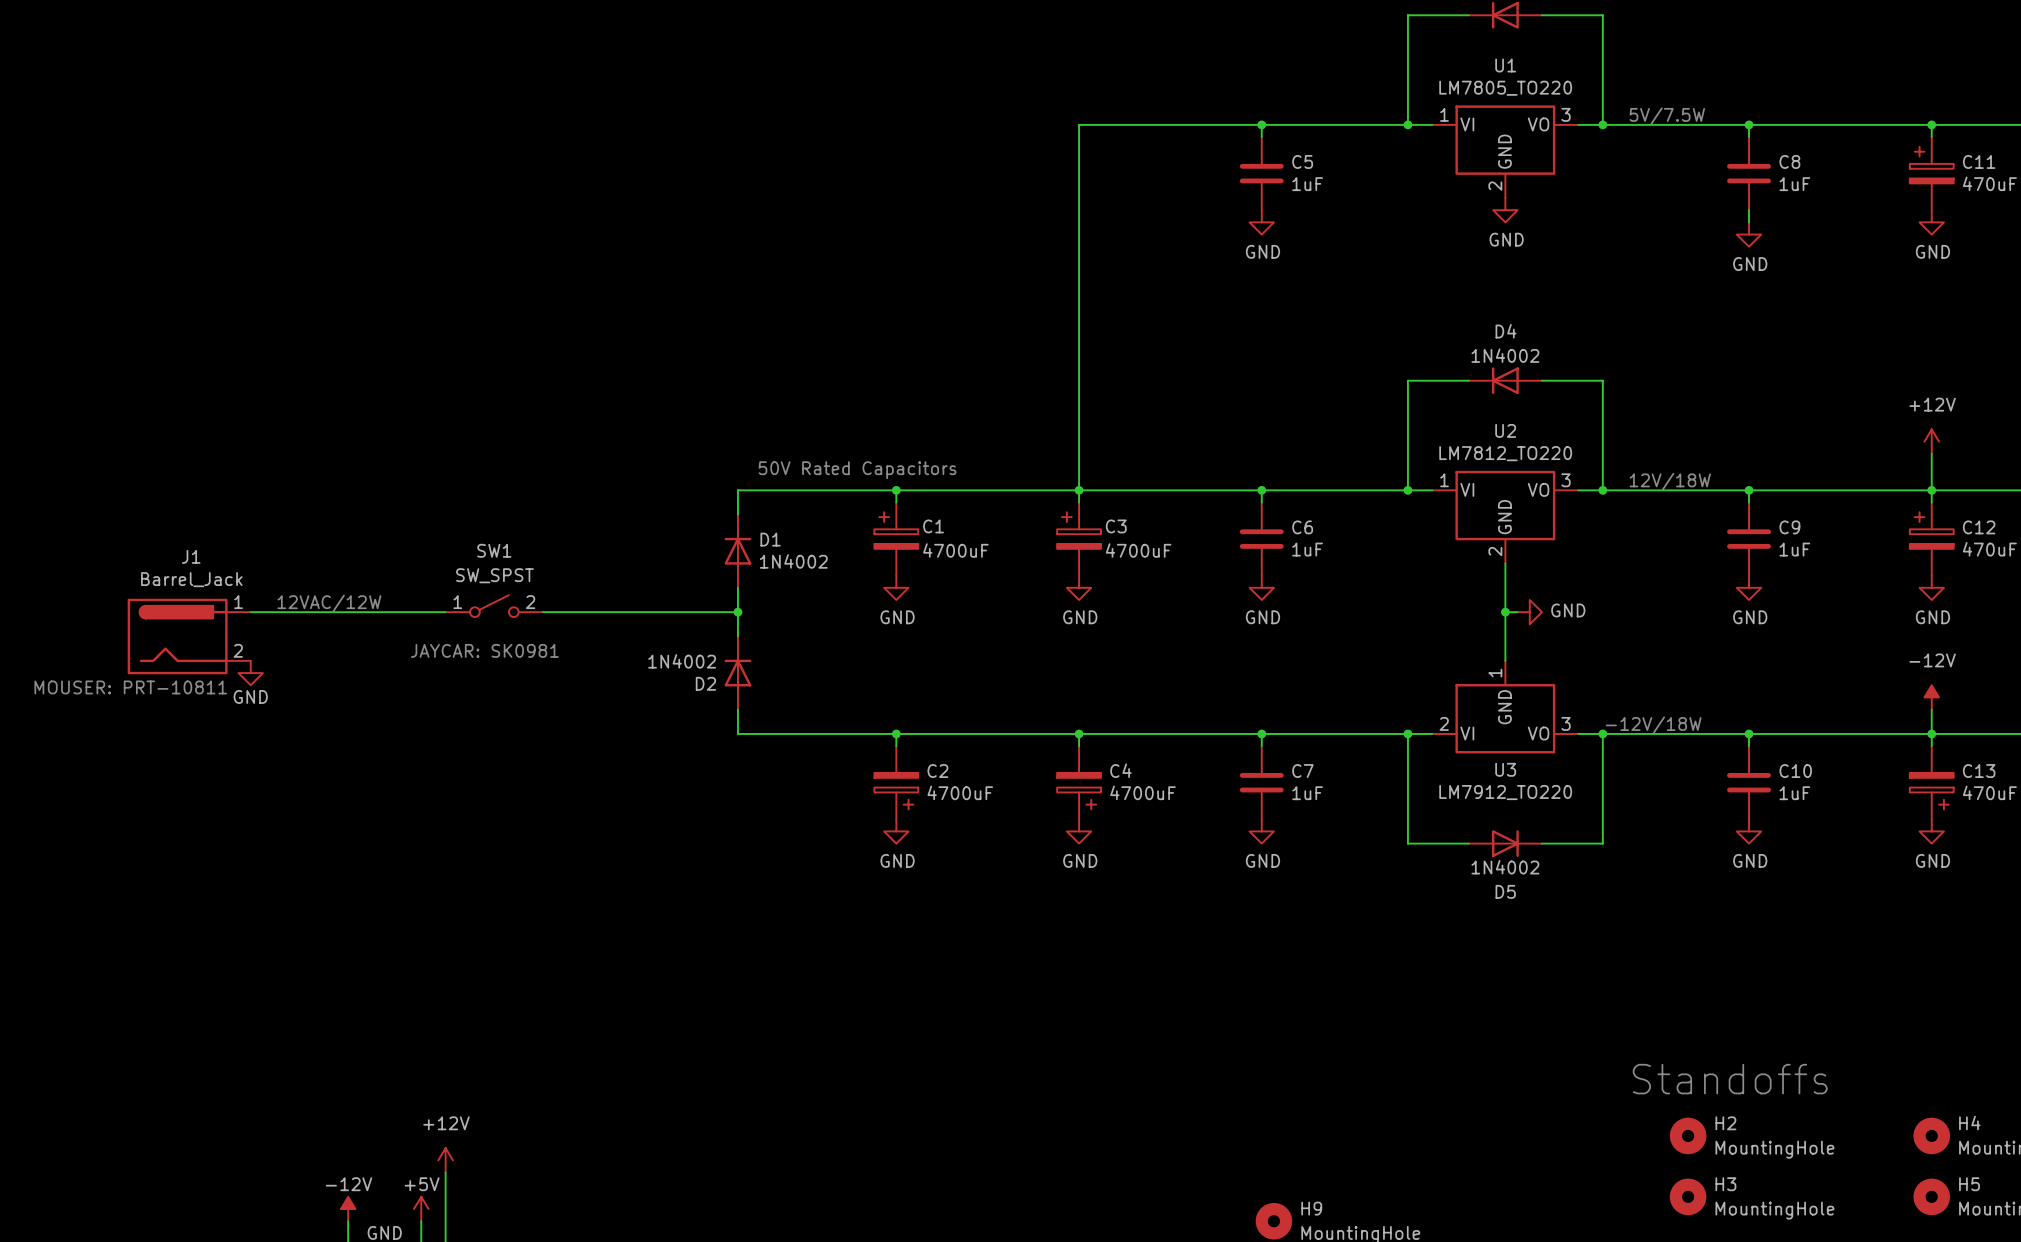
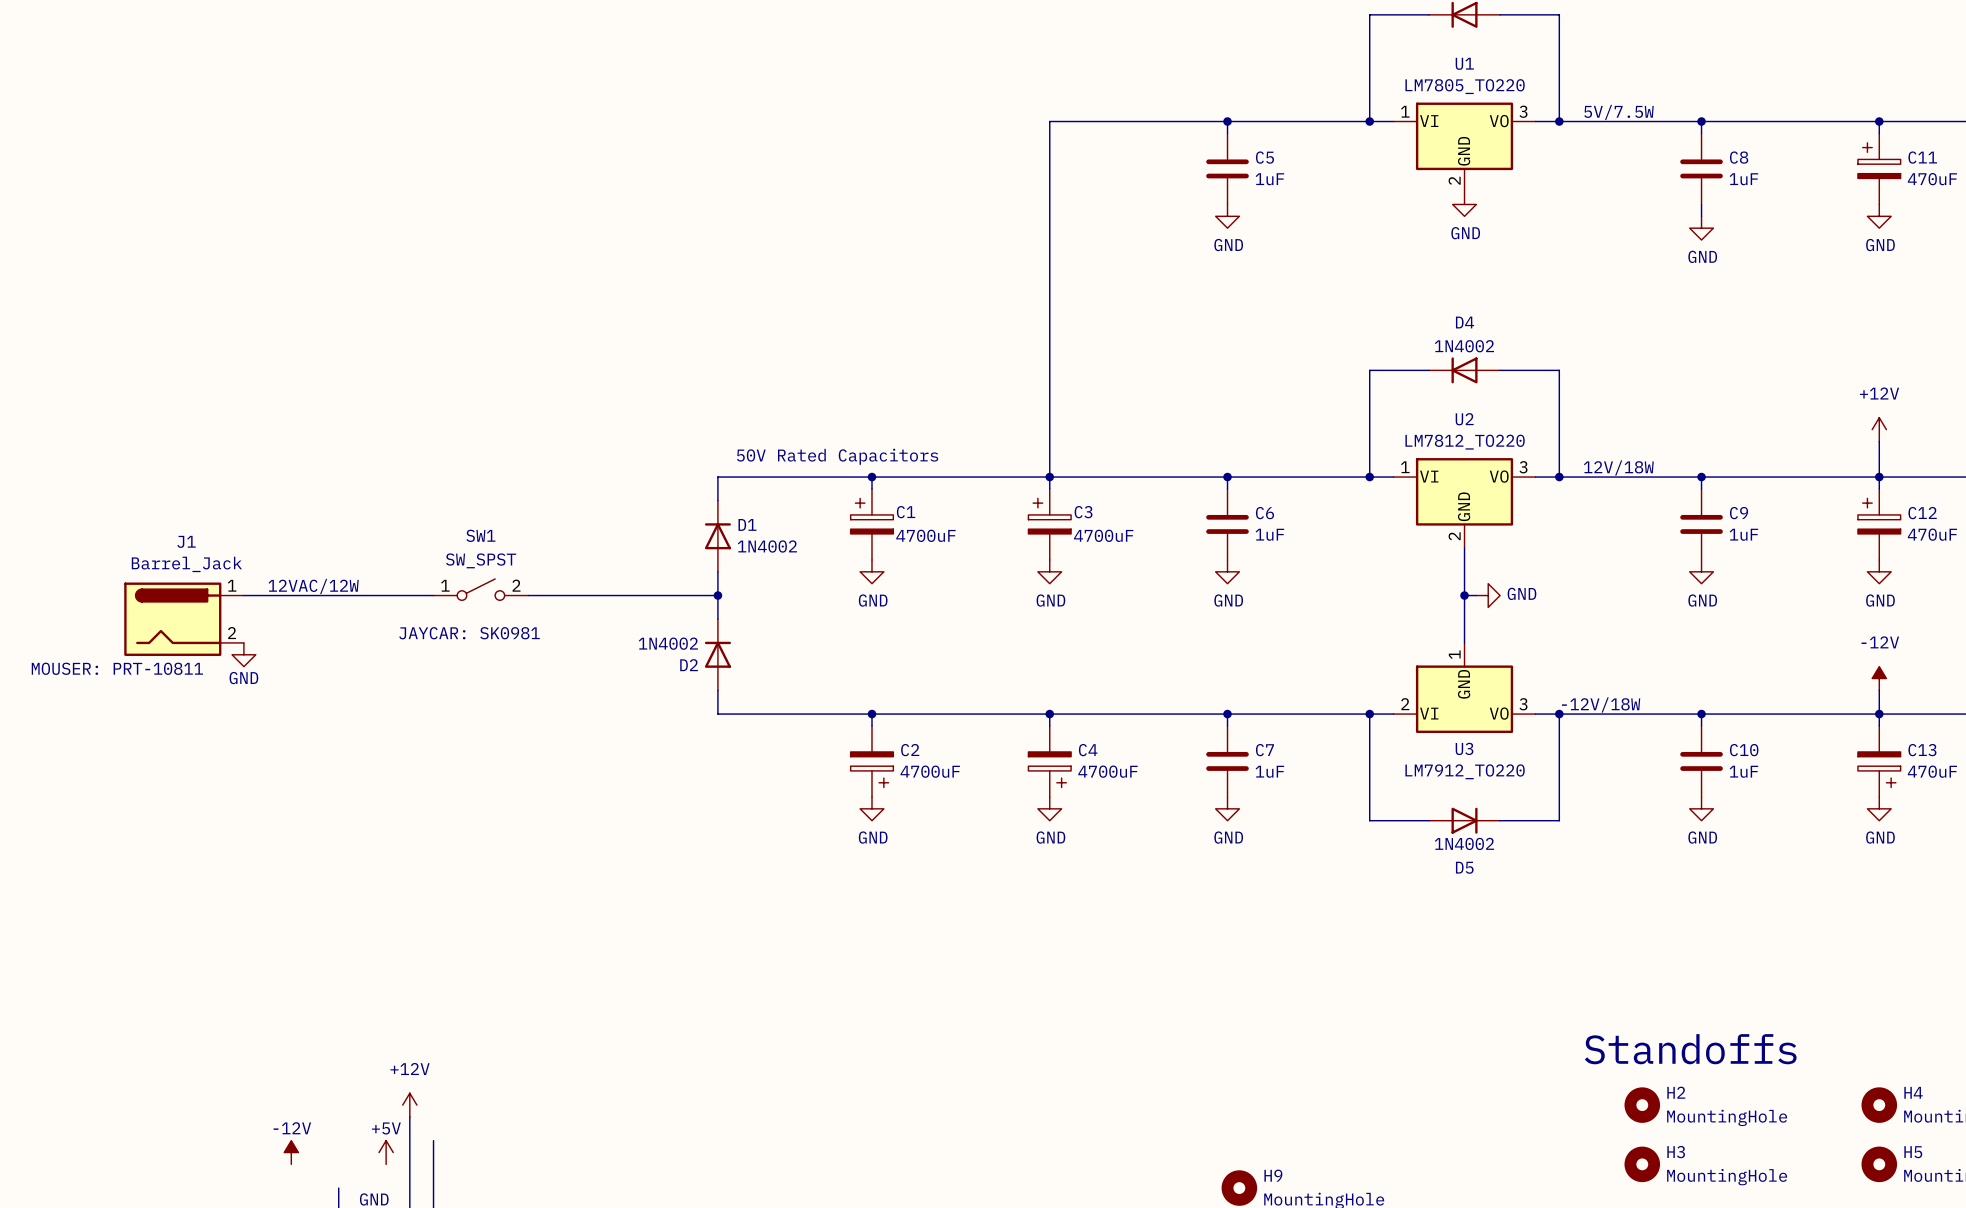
wire: none -> (409, 1116) (409, 1188)
power symbol position: +12V (445, 1160) -> +12V (409, 1105)
power symbol position: -12V (348, 1209) -> -12V (291, 1152)
power symbol position: +5V (421, 1209) -> +5V (386, 1152)

